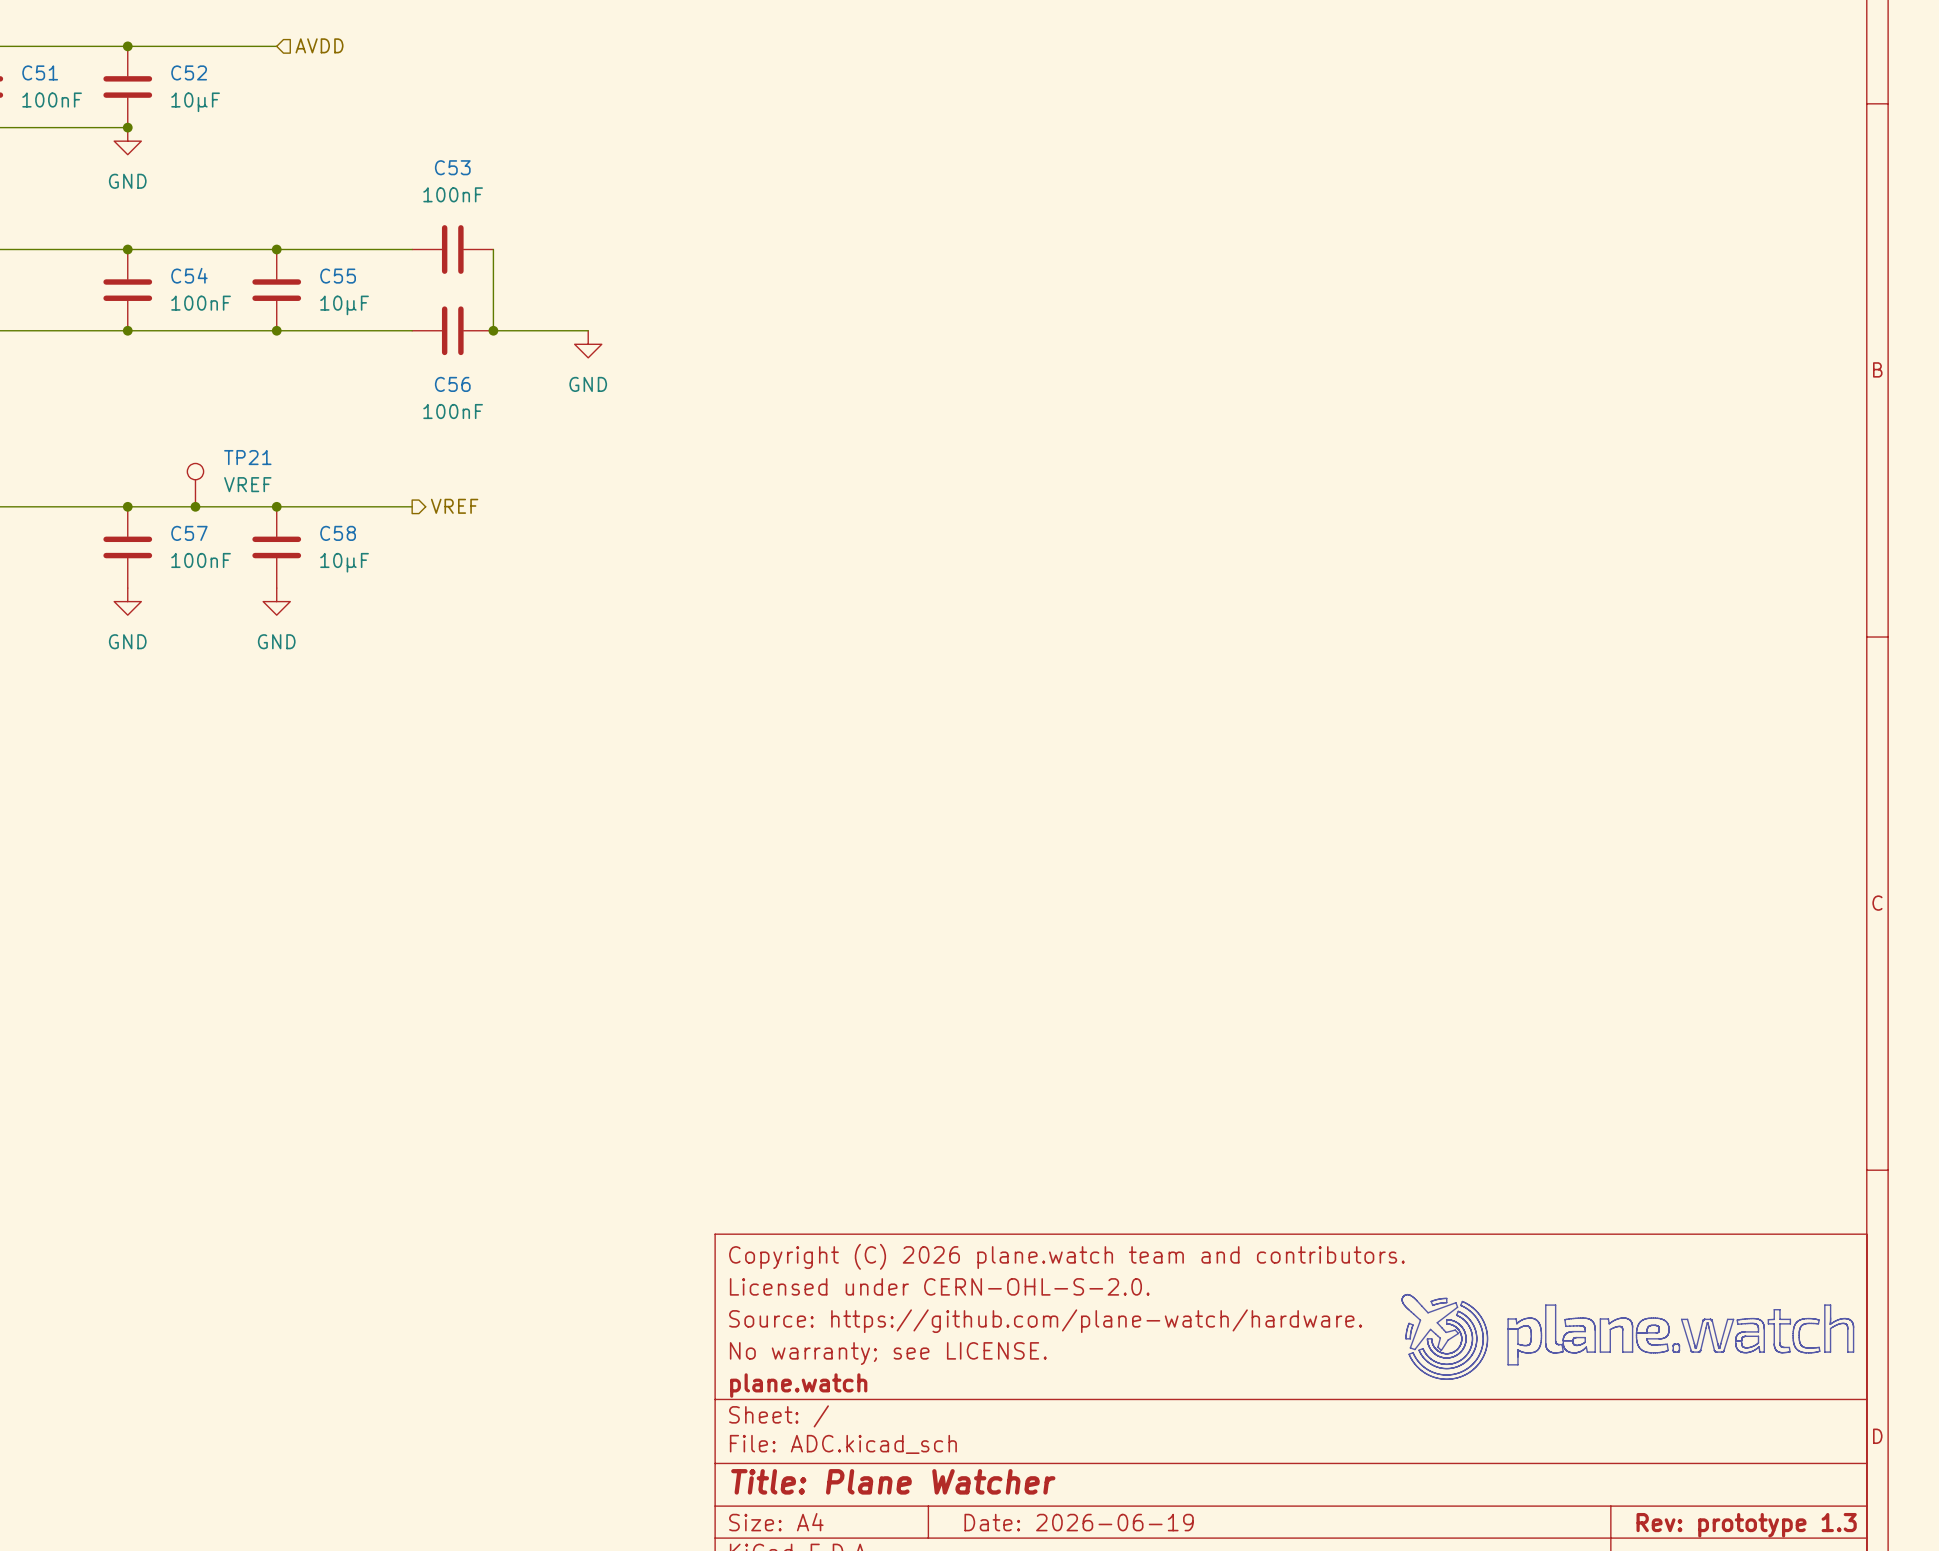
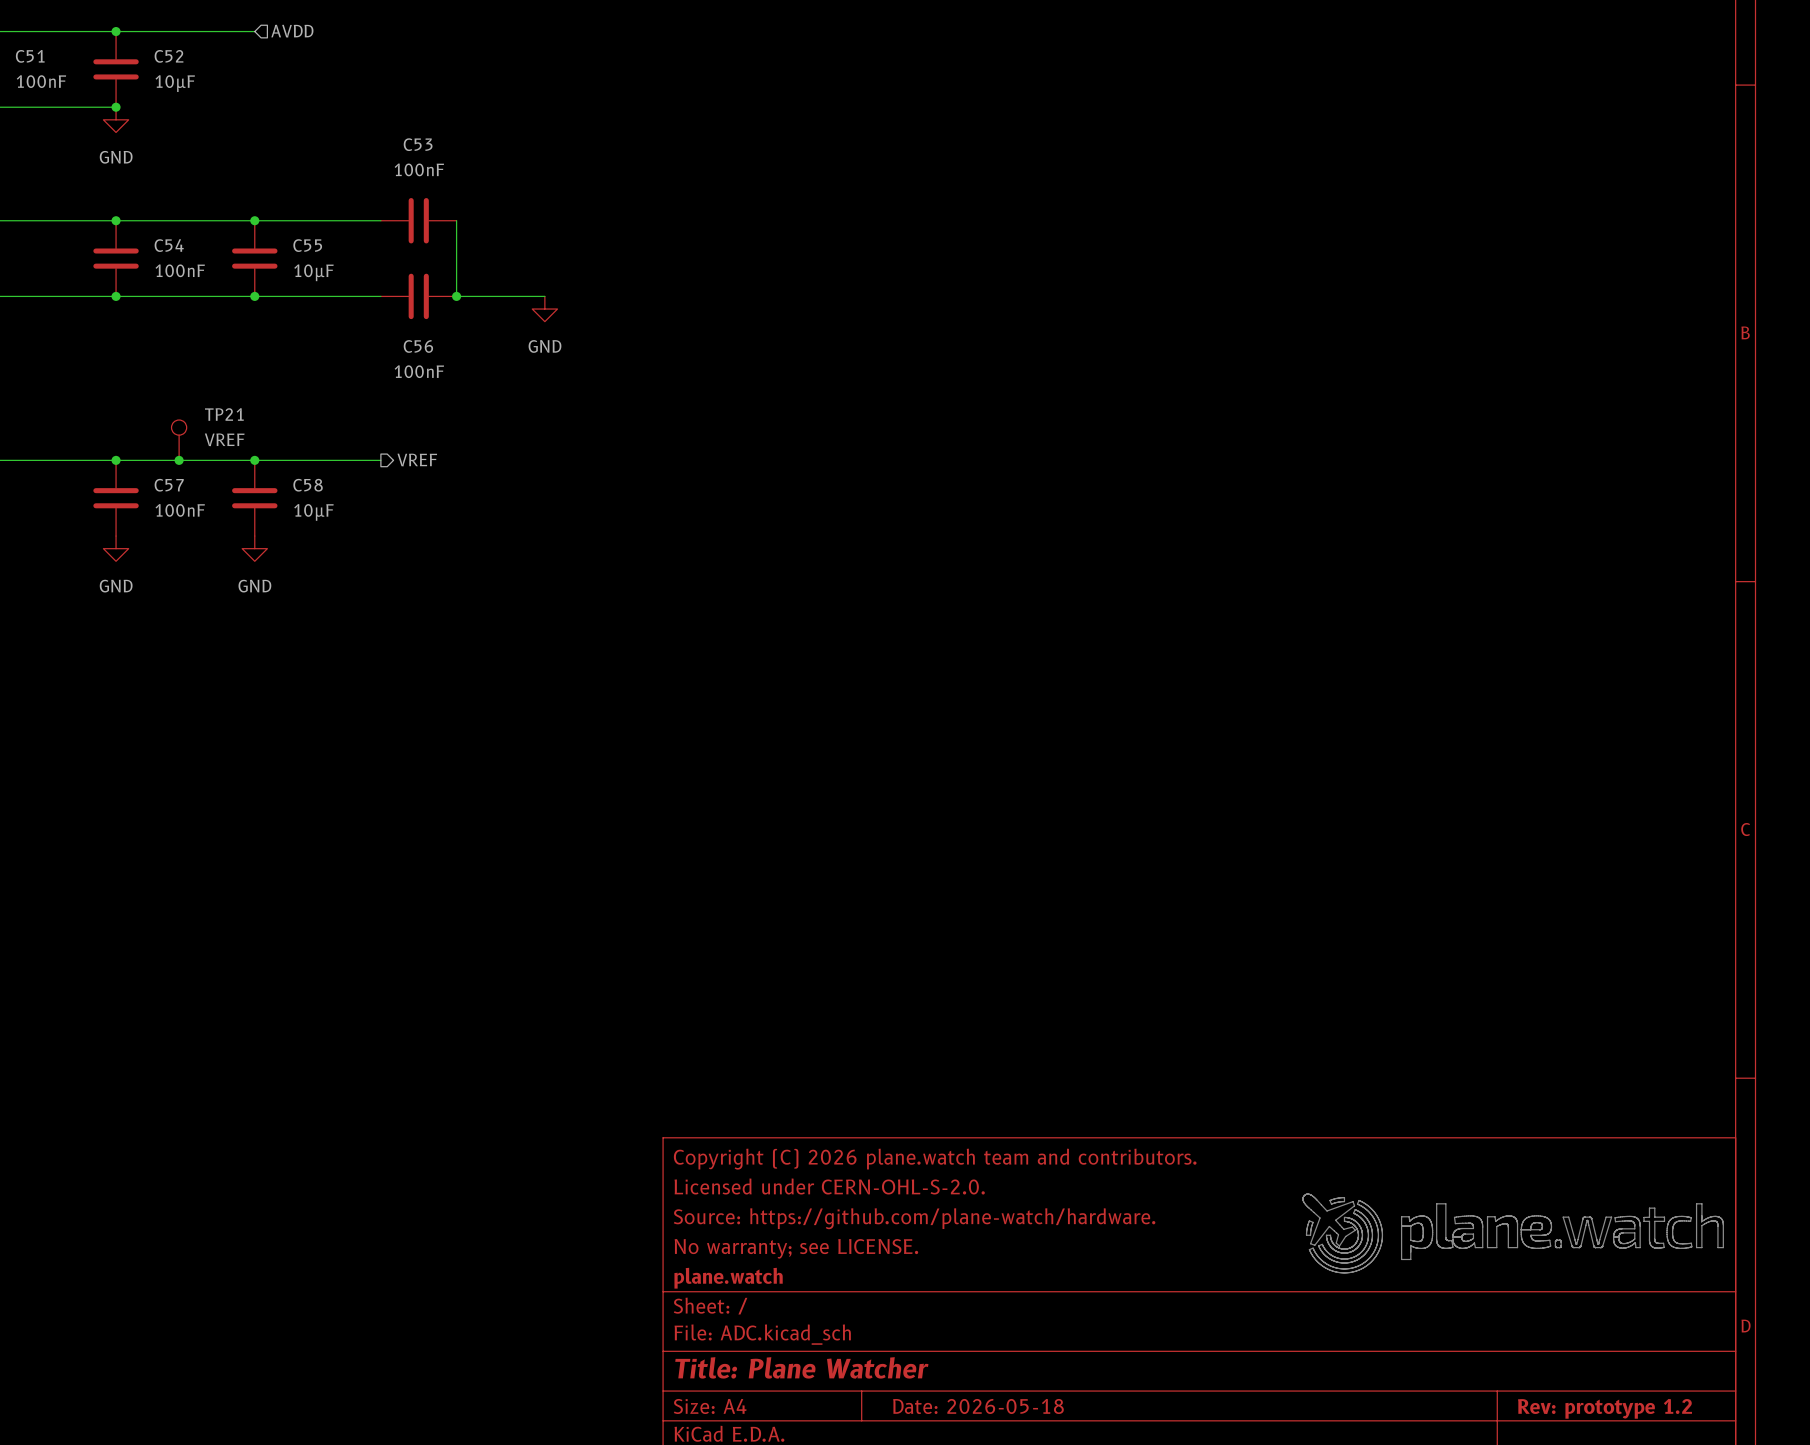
title block: Date: 2026-06-19 (1079, 1522) -> Date: 2026-05-18 (978, 1406)
title block: Rev: prototype 1.3 (1746, 1525) -> Rev: prototype 1.2 (1604, 1408)

